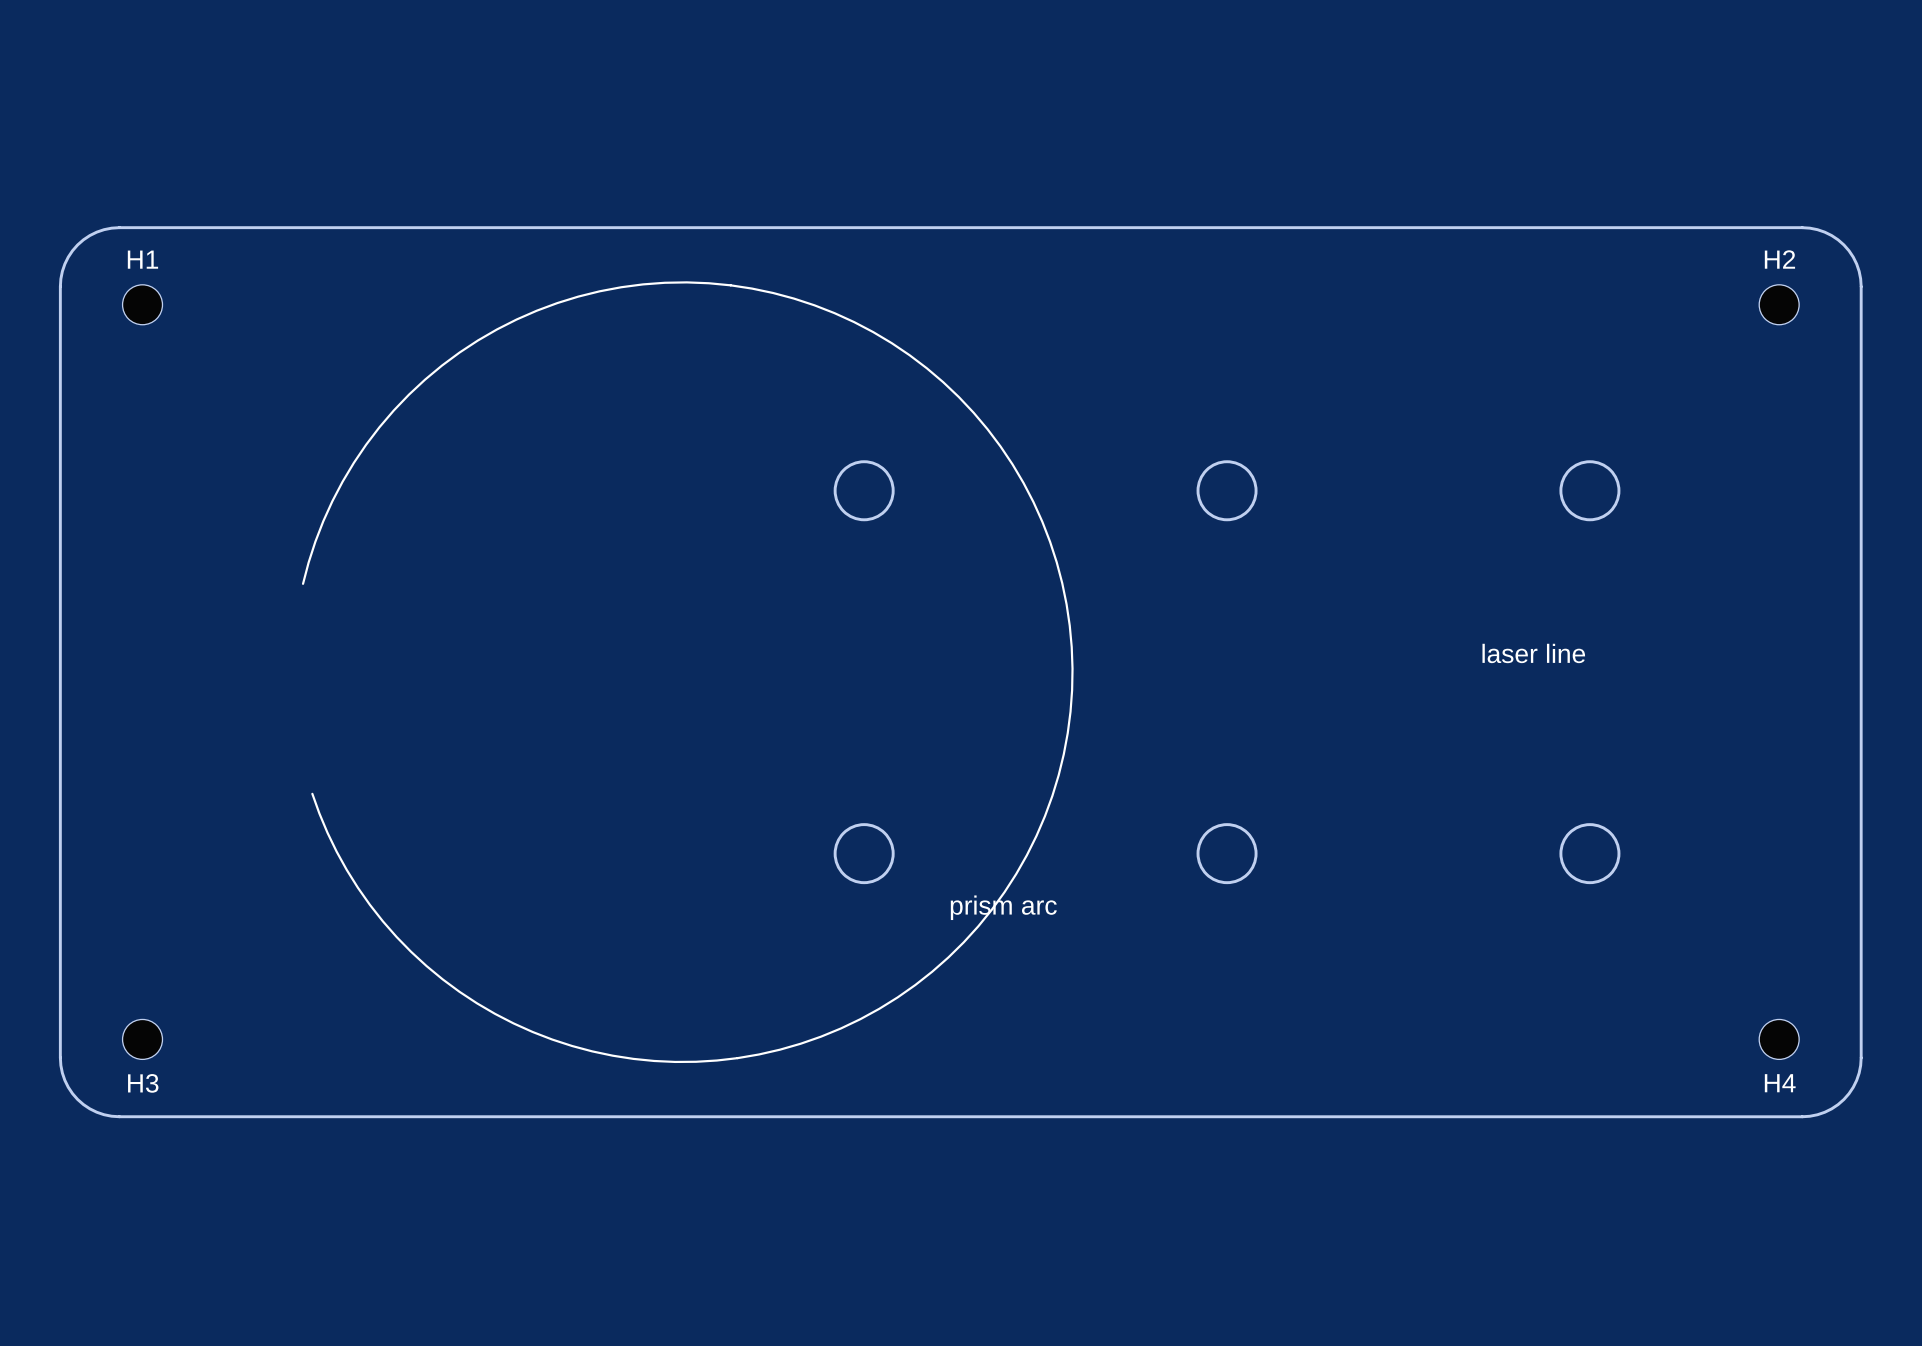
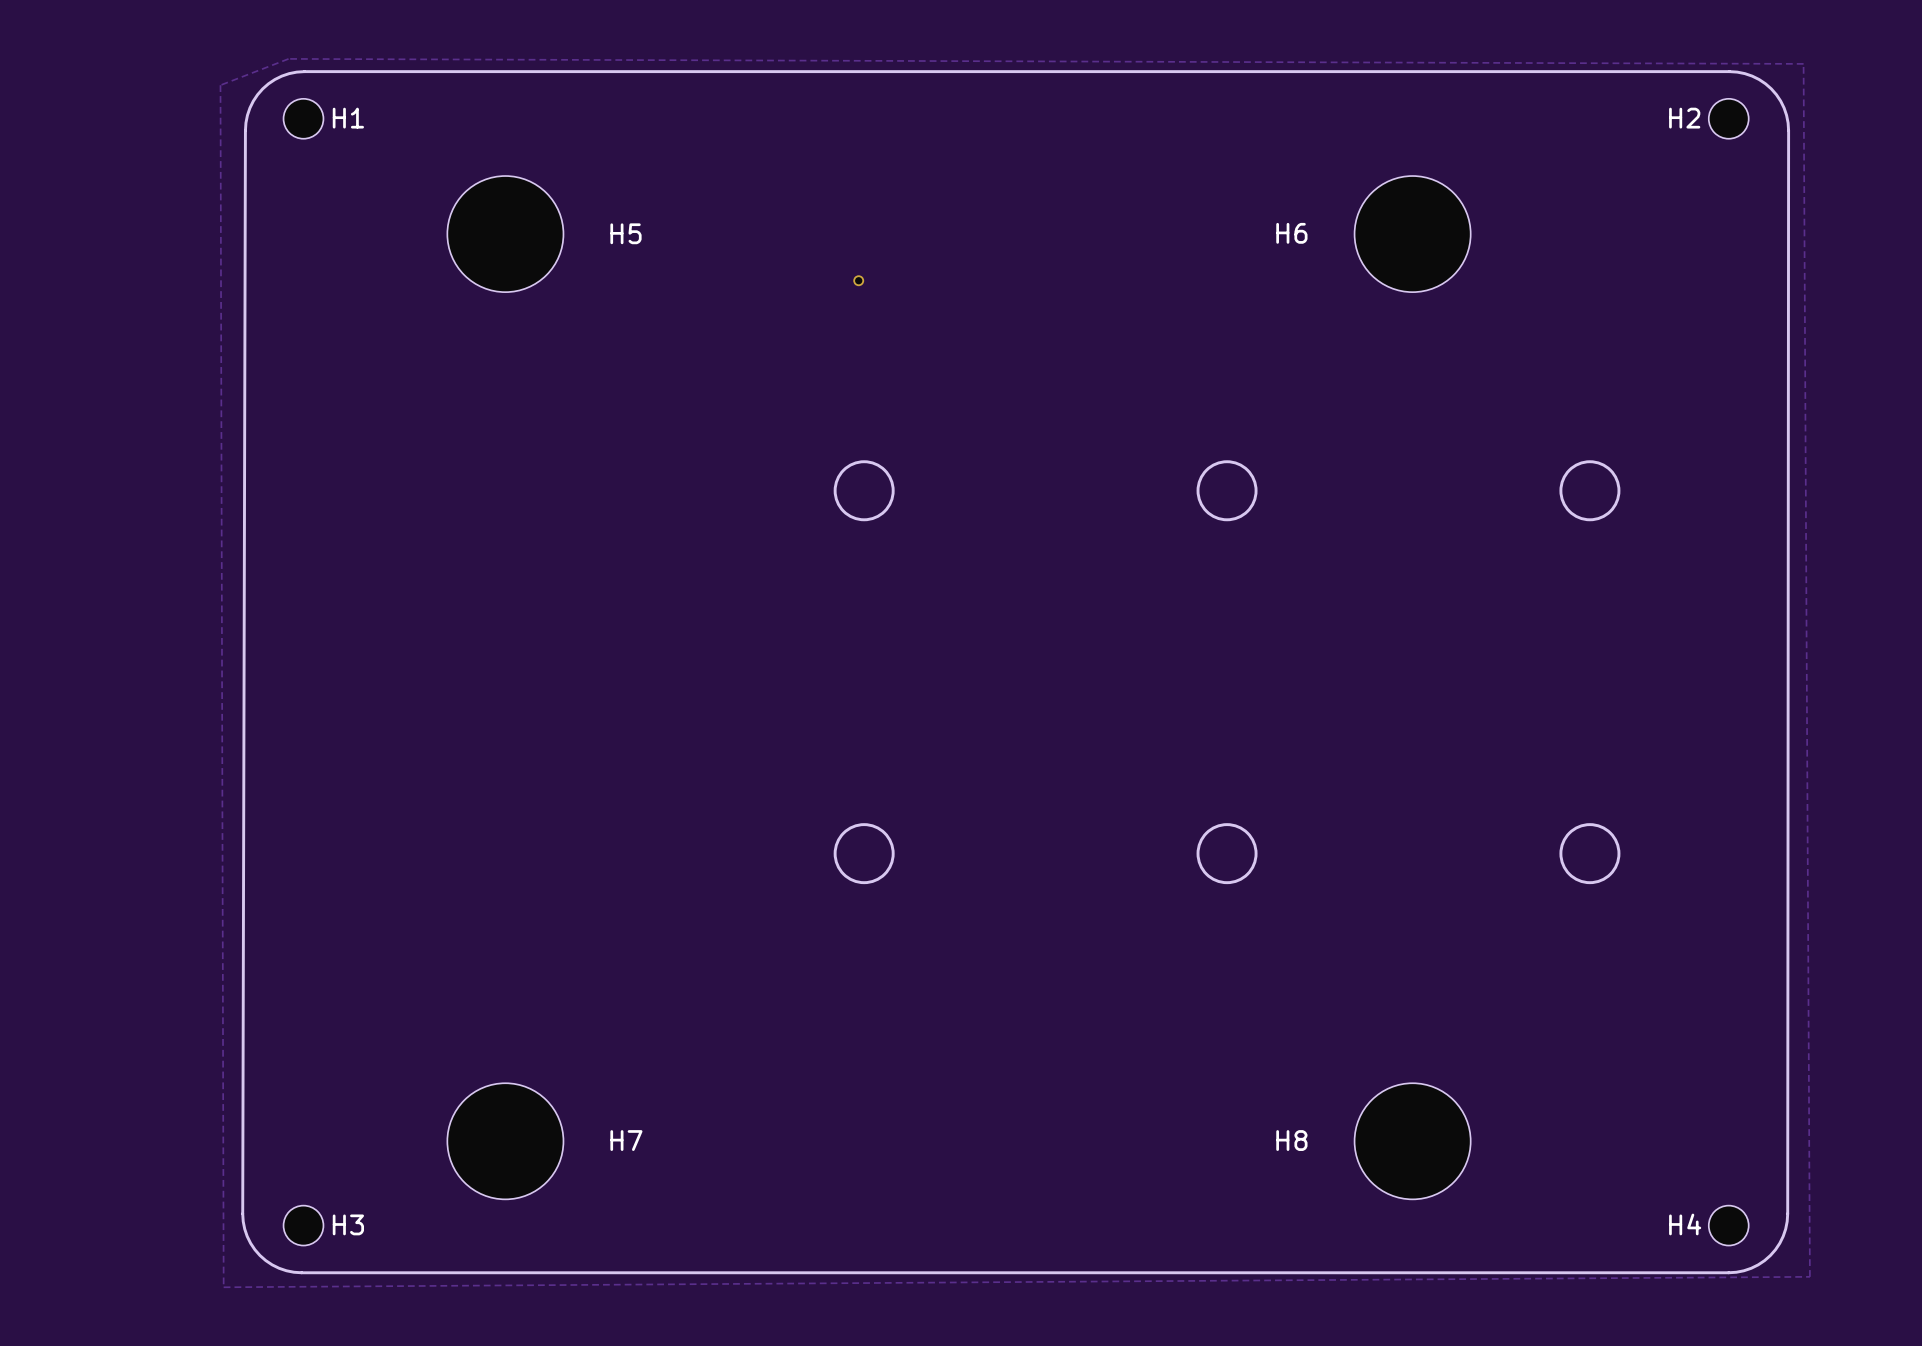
zone outline: none -> (288, 58) (1803, 63) (1809, 1276) (223, 1287) (220, 85) (288, 58)
board edge: (119, 227) (1802, 227) (1817, 229) (1831, 235) (1843, 244) (1853, 257) (1859, 271) (1861, 286) (1861, 1057) (1859, 1073) (1853, 1087) (1843, 1099) (1831, 1108) (1817, 1114) (1802, 1116) (119, 1116) (104, 1114) (89, 1108) (77, 1099) (68, 1087) (62, 1073) (60, 1057) (60, 286) (64, 264) (77, 244) (96, 232) (119, 227) -> (304, 71) (281, 76) (262, 88) (249, 108) (245, 130) (242, 1213) (244, 1229) (250, 1243) (265, 1260) (286, 1270) (301, 1272) (1728, 1272) (1743, 1270) (1758, 1264) (1775, 1249) (1785, 1229) (1787, 1213) (1788, 130) (1786, 115) (1780, 101) (1765, 83) (1744, 73) (1729, 71) (304, 71)
H5: none -> (505, 234)
H6: none -> (1412, 234)
H1 name position: H1 (142, 259) -> H1 (348, 118)
H2 name position: H2 (1779, 259) -> H2 (1684, 118)
via: none -> (858, 280)
H1 position: (142, 304) -> (303, 118)
H2 position: (1779, 304) -> (1728, 118)
line: (303, 583) (323, 521) (353, 462) (393, 410) (441, 365) (496, 329) (557, 303) (599, 291) (643, 284) (708, 283) (773, 293) (834, 313) (873, 332) (909, 355) (958, 397) (987, 429) (1012, 464) (1042, 521) (1062, 583) (1071, 647) (1072, 690) (1067, 733) (1052, 795) (1026, 855) (991, 909) (963, 942) (932, 971) (879, 1008) (821, 1036) (758, 1054) (696, 1061) (633, 1058) (572, 1045) (532, 1031) (495, 1013) (459, 991) (426, 966) (382, 921) (346, 869) (327, 832) (312, 793) -> none
text: laser line (1533, 653) -> none
text: prism arc (1003, 907) -> none
H3 position: (142, 1039) -> (303, 1225)
H4 position: (1779, 1039) -> (1728, 1225)
H3 name position: H3 (143, 1083) -> H3 (348, 1224)
H4 name position: H4 (1780, 1083) -> H4 (1685, 1224)
H7: none -> (505, 1141)
H8: none -> (1412, 1141)

